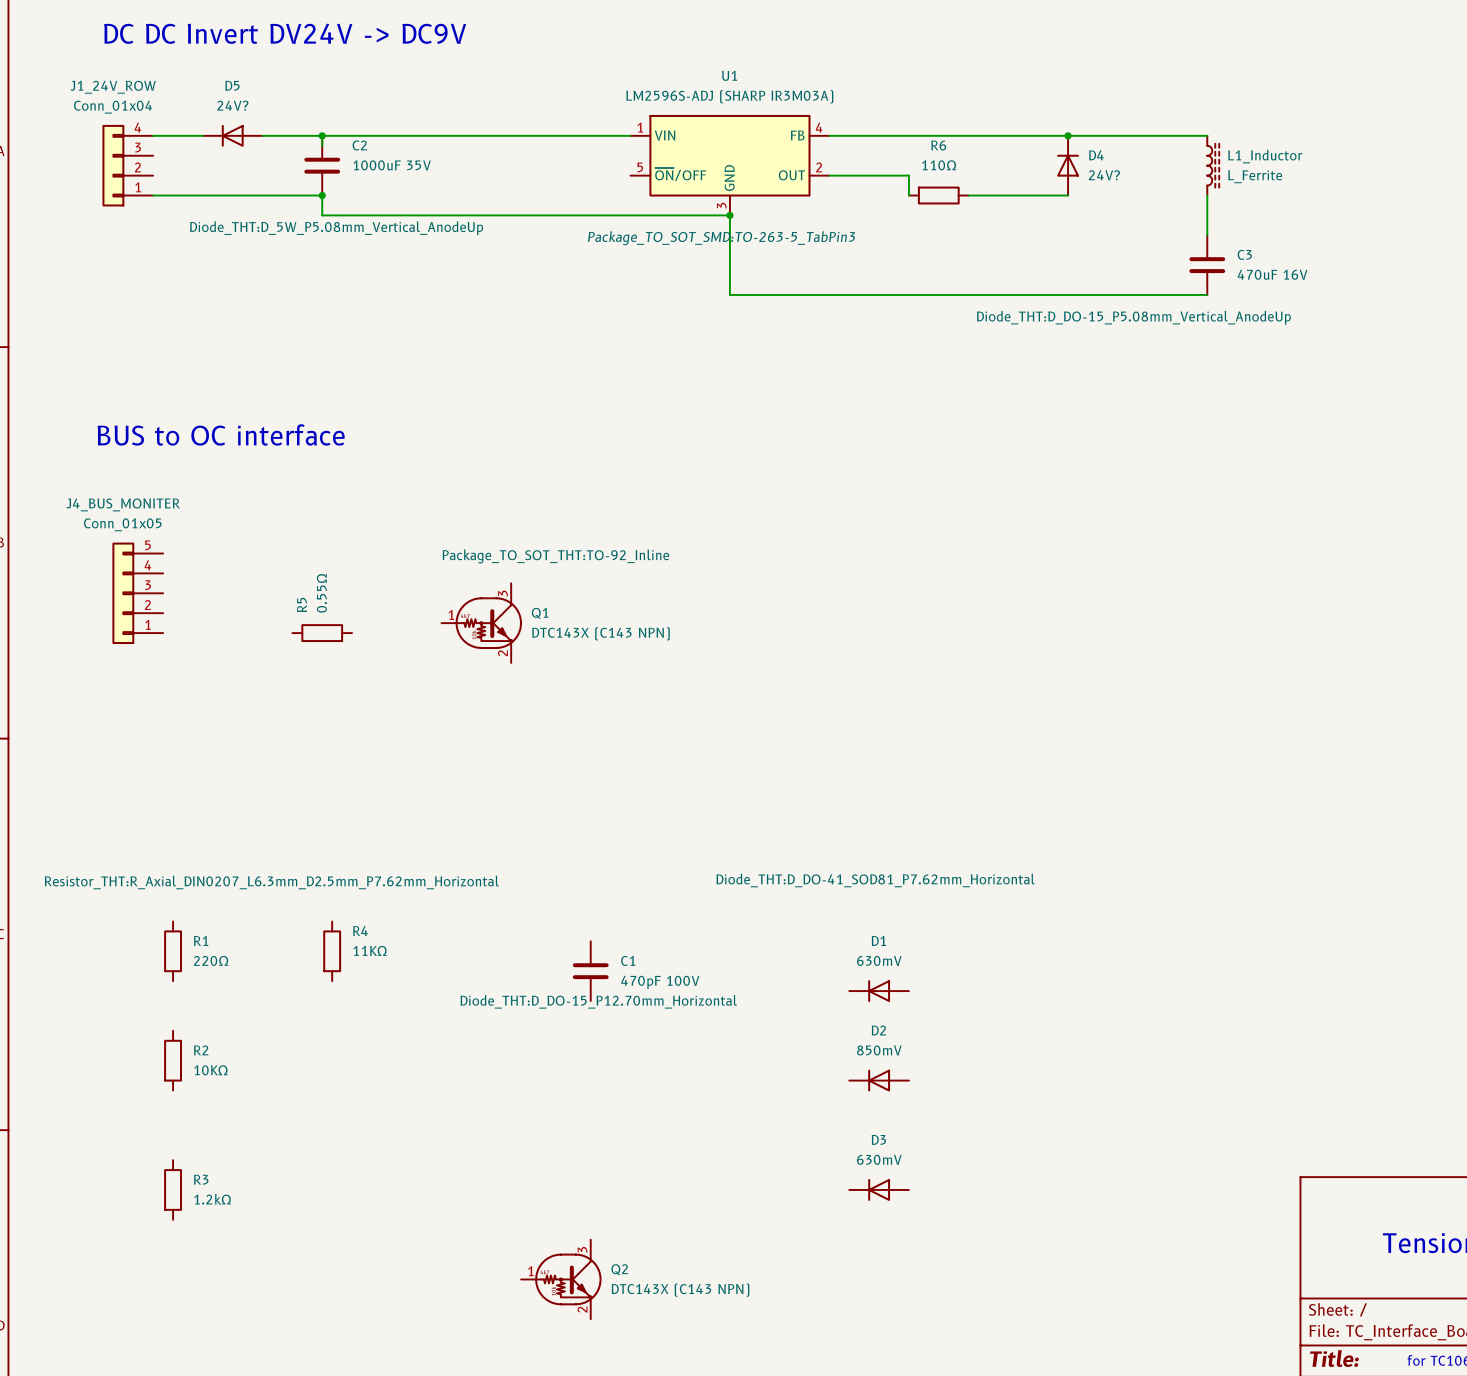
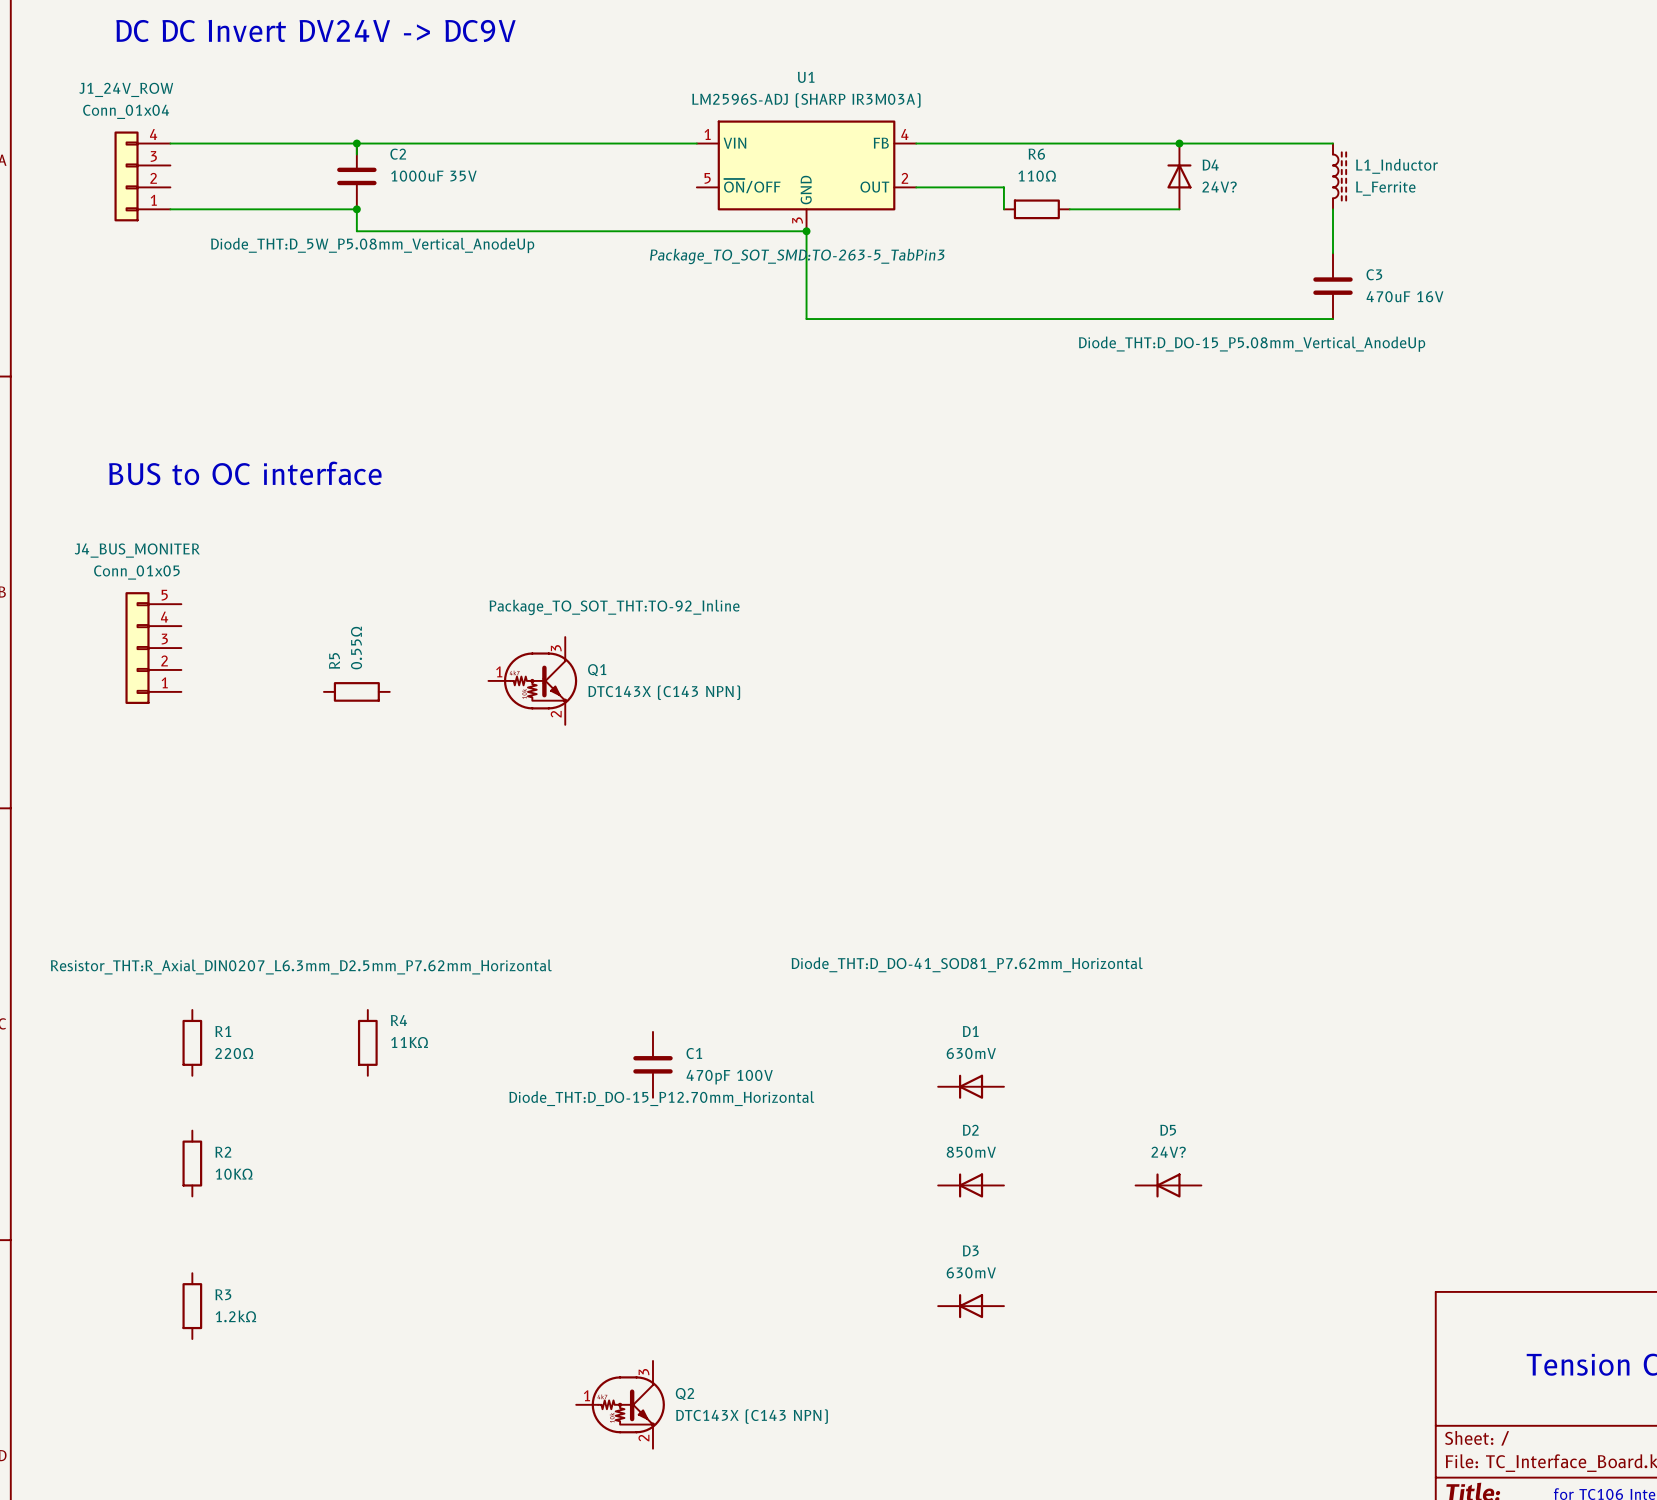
D5 position: (232, 135) -> (1168, 1185)

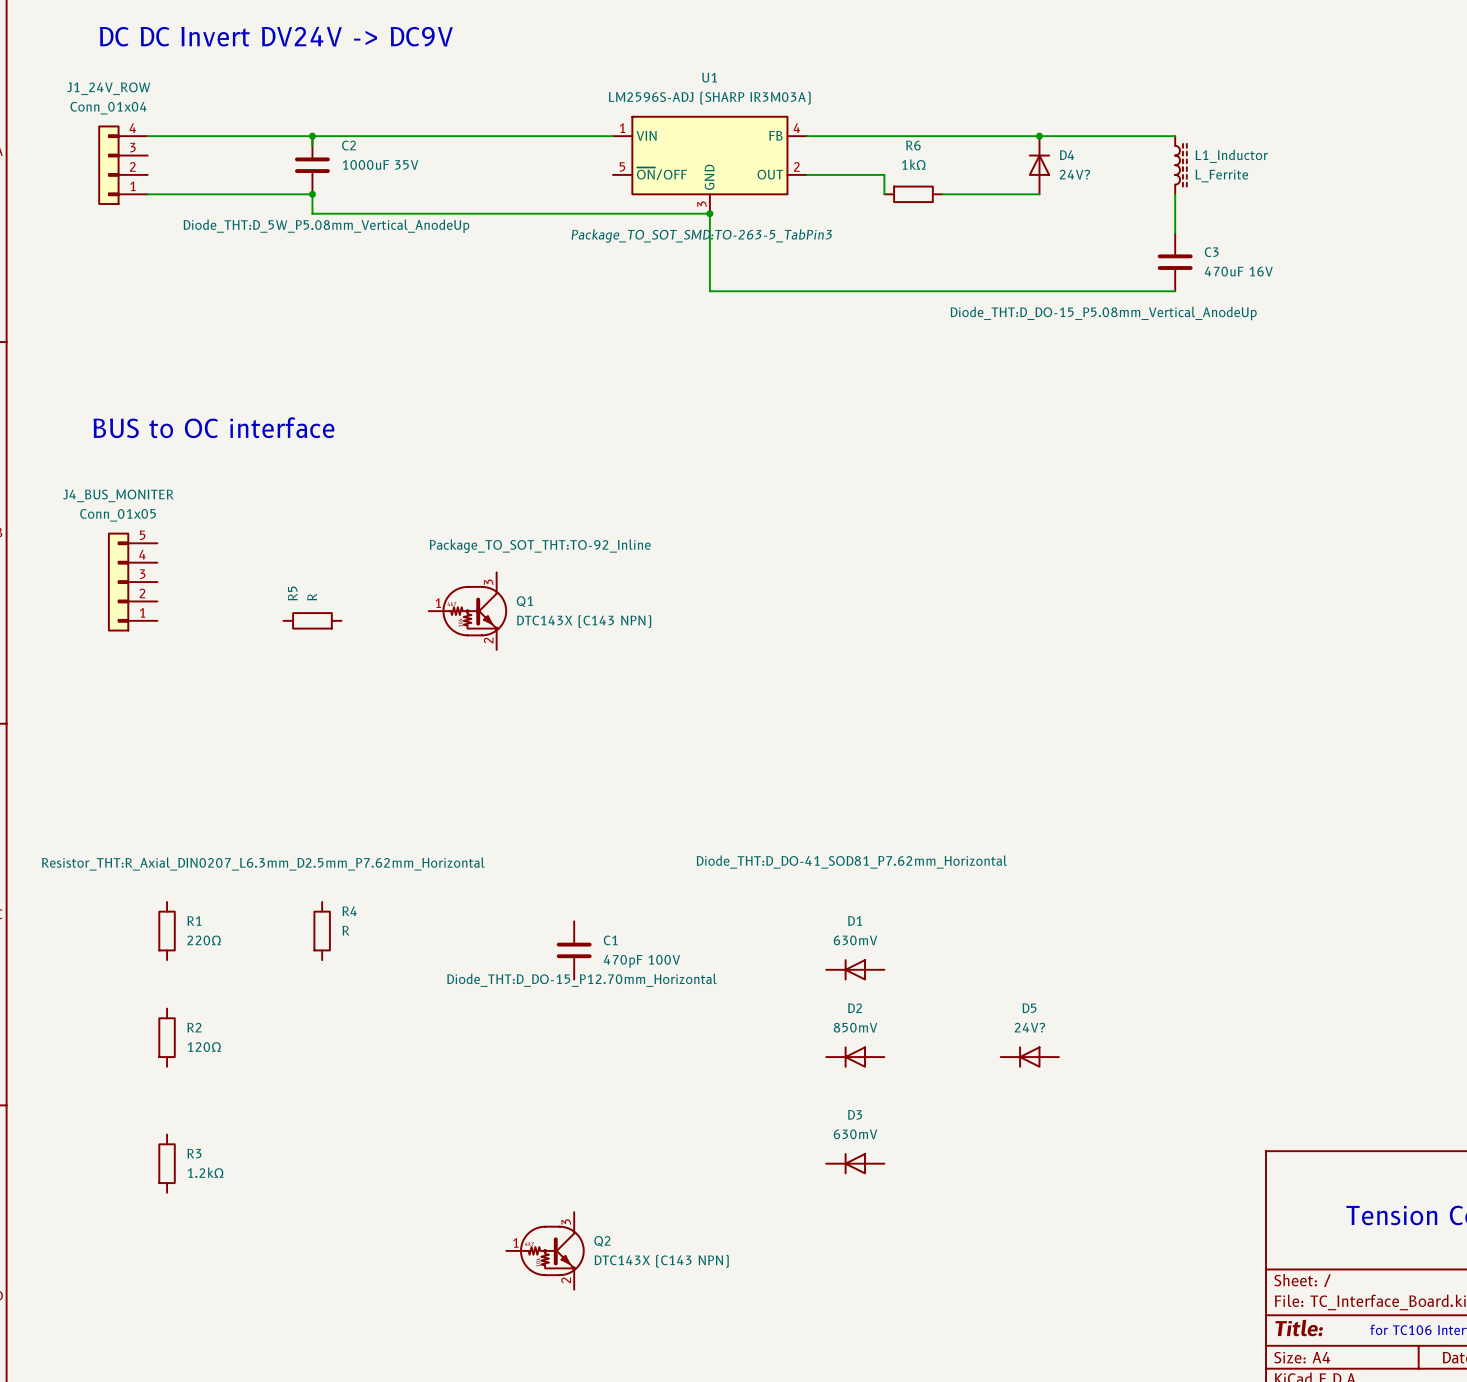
R6 value: 110Ω (1037, 176) -> 1kΩ (913, 164)
R5 value: 0.55Ω (356, 648) -> R (312, 597)
R4 value: 11KΩ (409, 1042) -> R (345, 930)
R2 value: 10KΩ (234, 1174) -> 120Ω (204, 1047)

